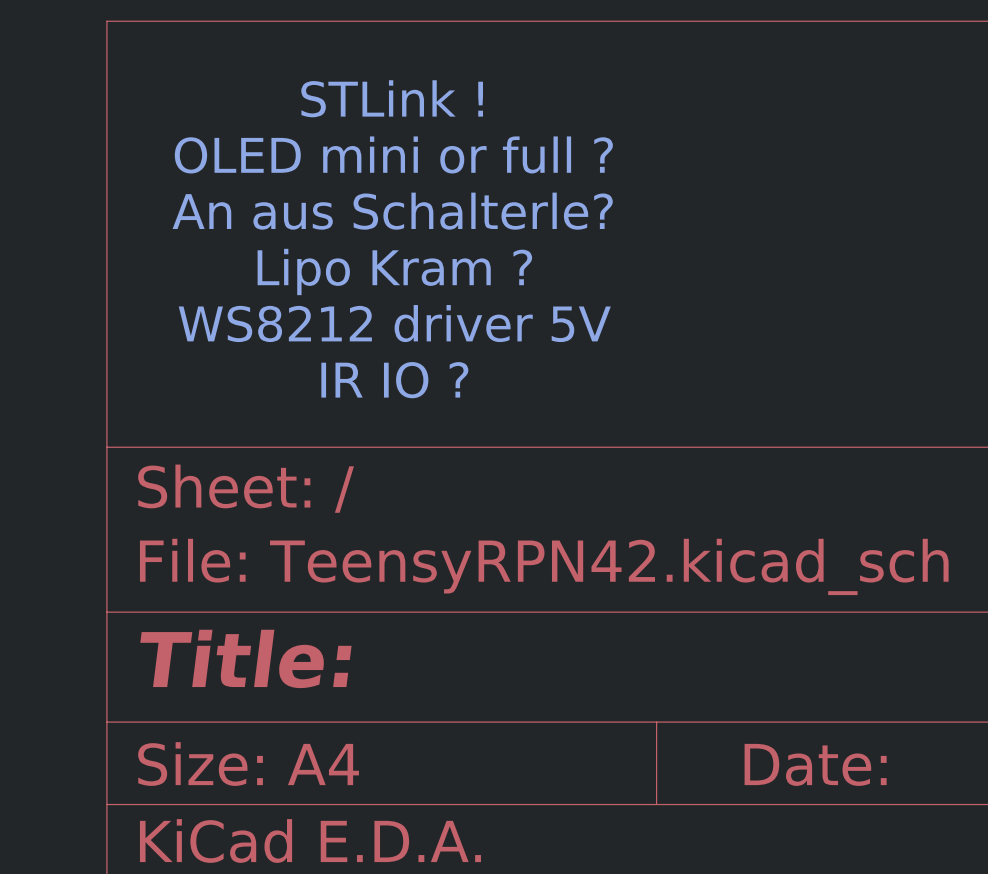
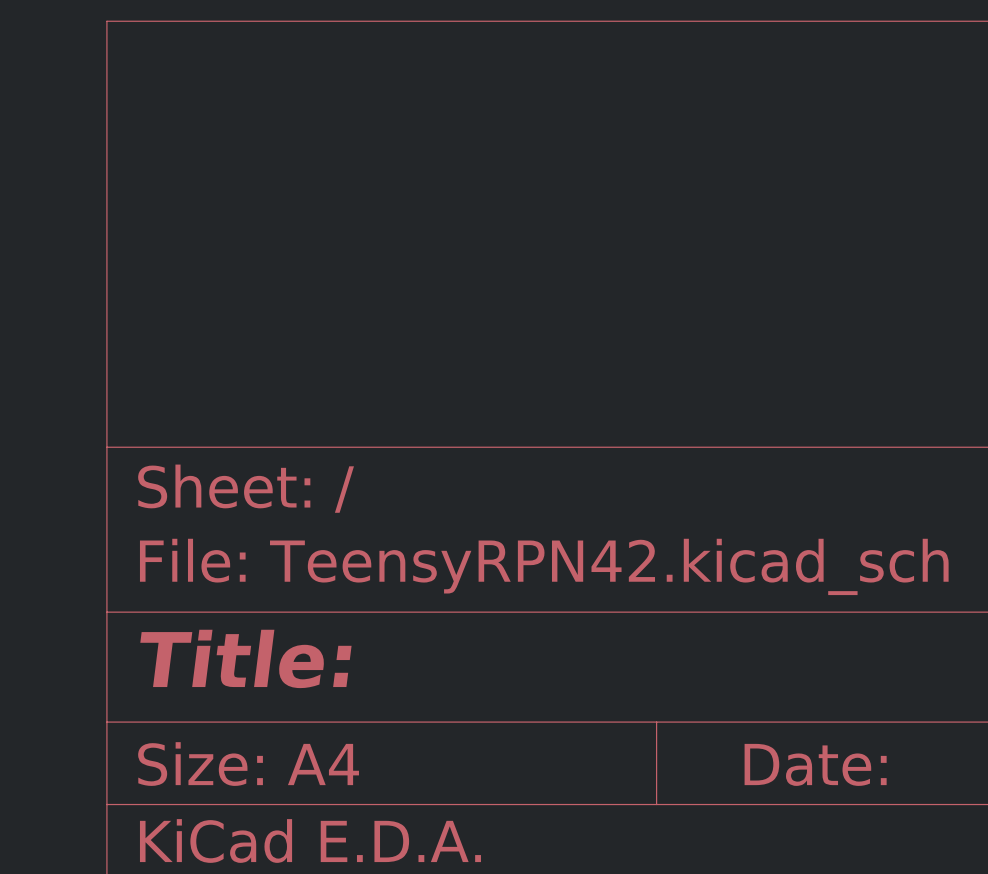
text: STLink ! (392, 98) -> none
text: OLED mini or full ? (393, 154) -> none
text: An aus Schalterle? (392, 211) -> none
text: Lipo Kram ? (394, 271) -> none
text: WS8212 driver 5V (394, 323) -> none
text: IR IO ? (394, 380) -> none

